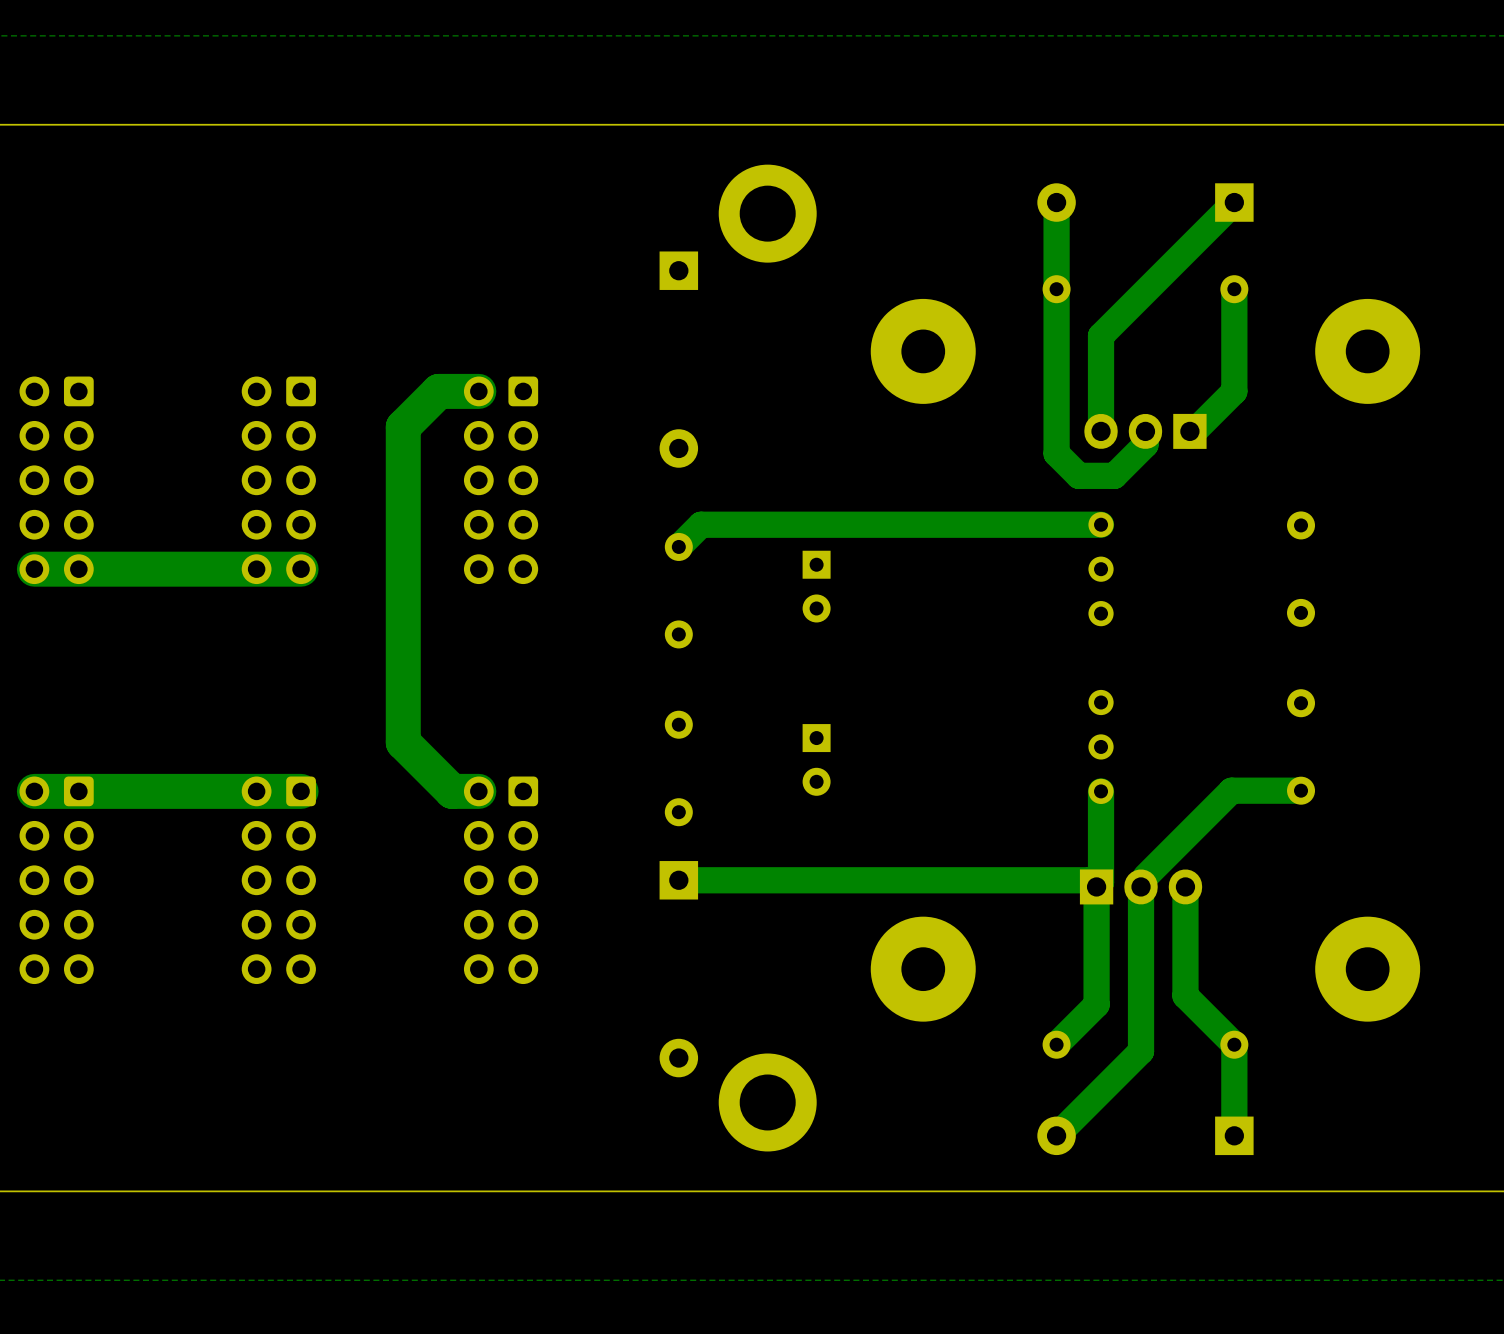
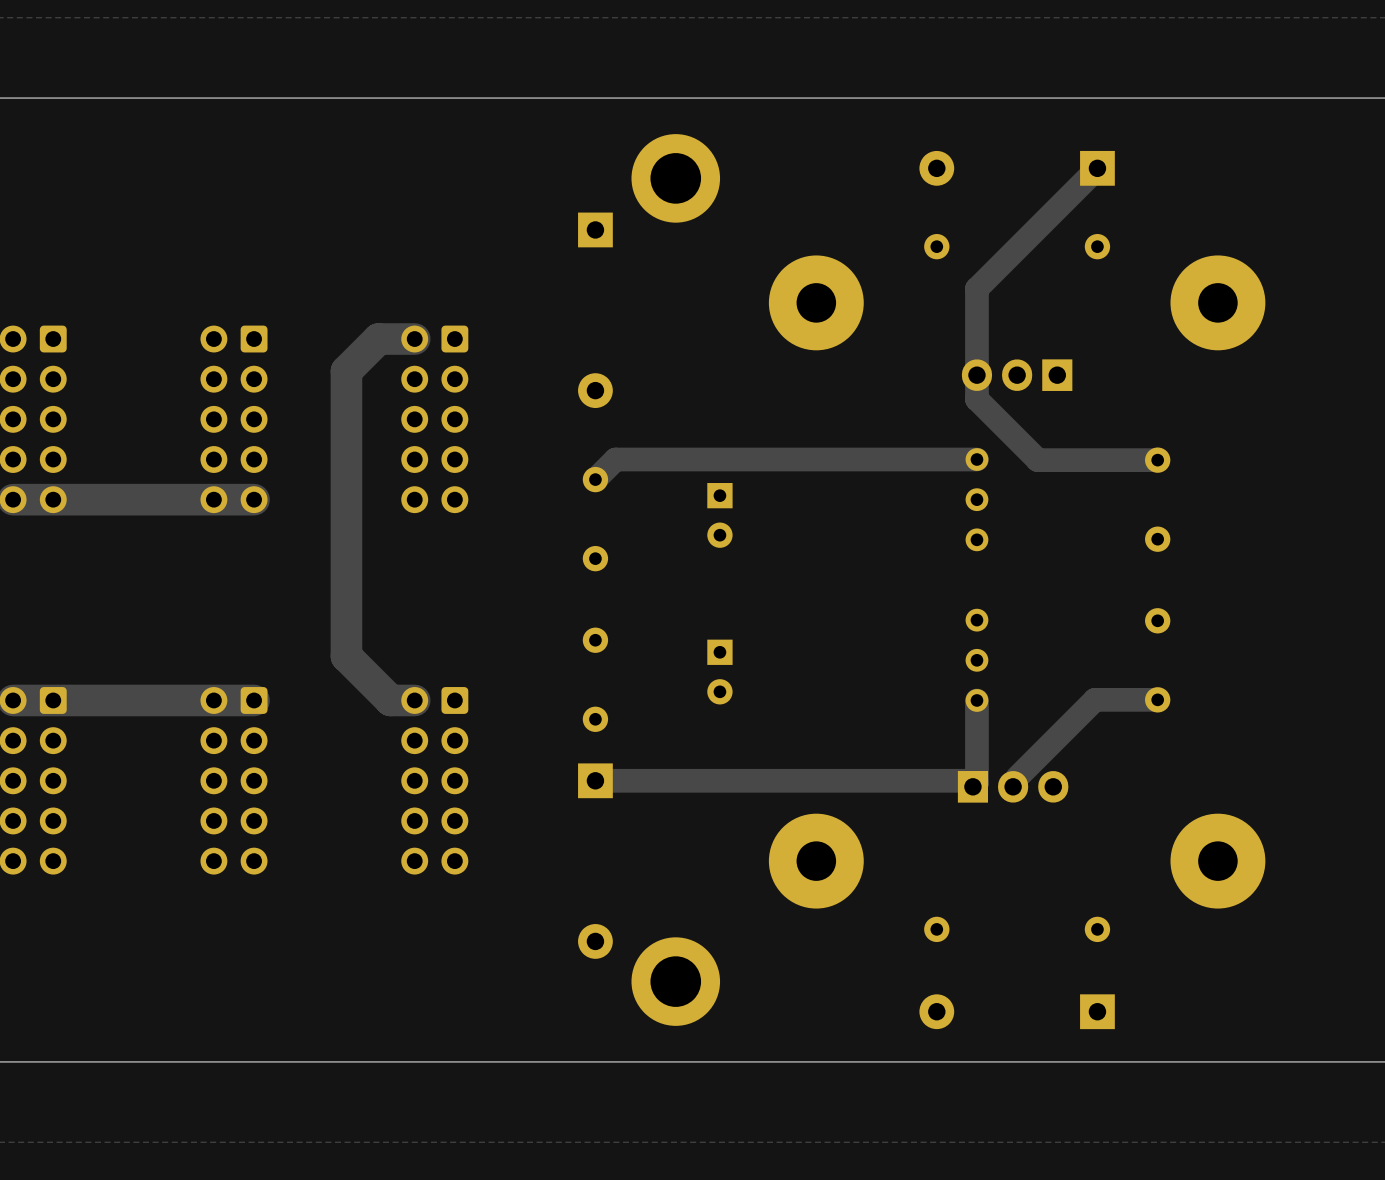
track: (1056, 202) (1056, 453) (1078, 475) (1114, 475) (1145, 444) (1145, 431) -> none
track: (1234, 289) (1234, 391) (1189, 435) -> none
track: none -> (976, 375) (976, 399) (1037, 460) (1157, 460)
track: (1096, 886) (1096, 1004) (1056, 1044) -> none
track: (1141, 886) (1141, 1051) (1056, 1135) -> none
track: (1185, 886) (1185, 995) (1234, 1044) (1234, 1135) -> none

